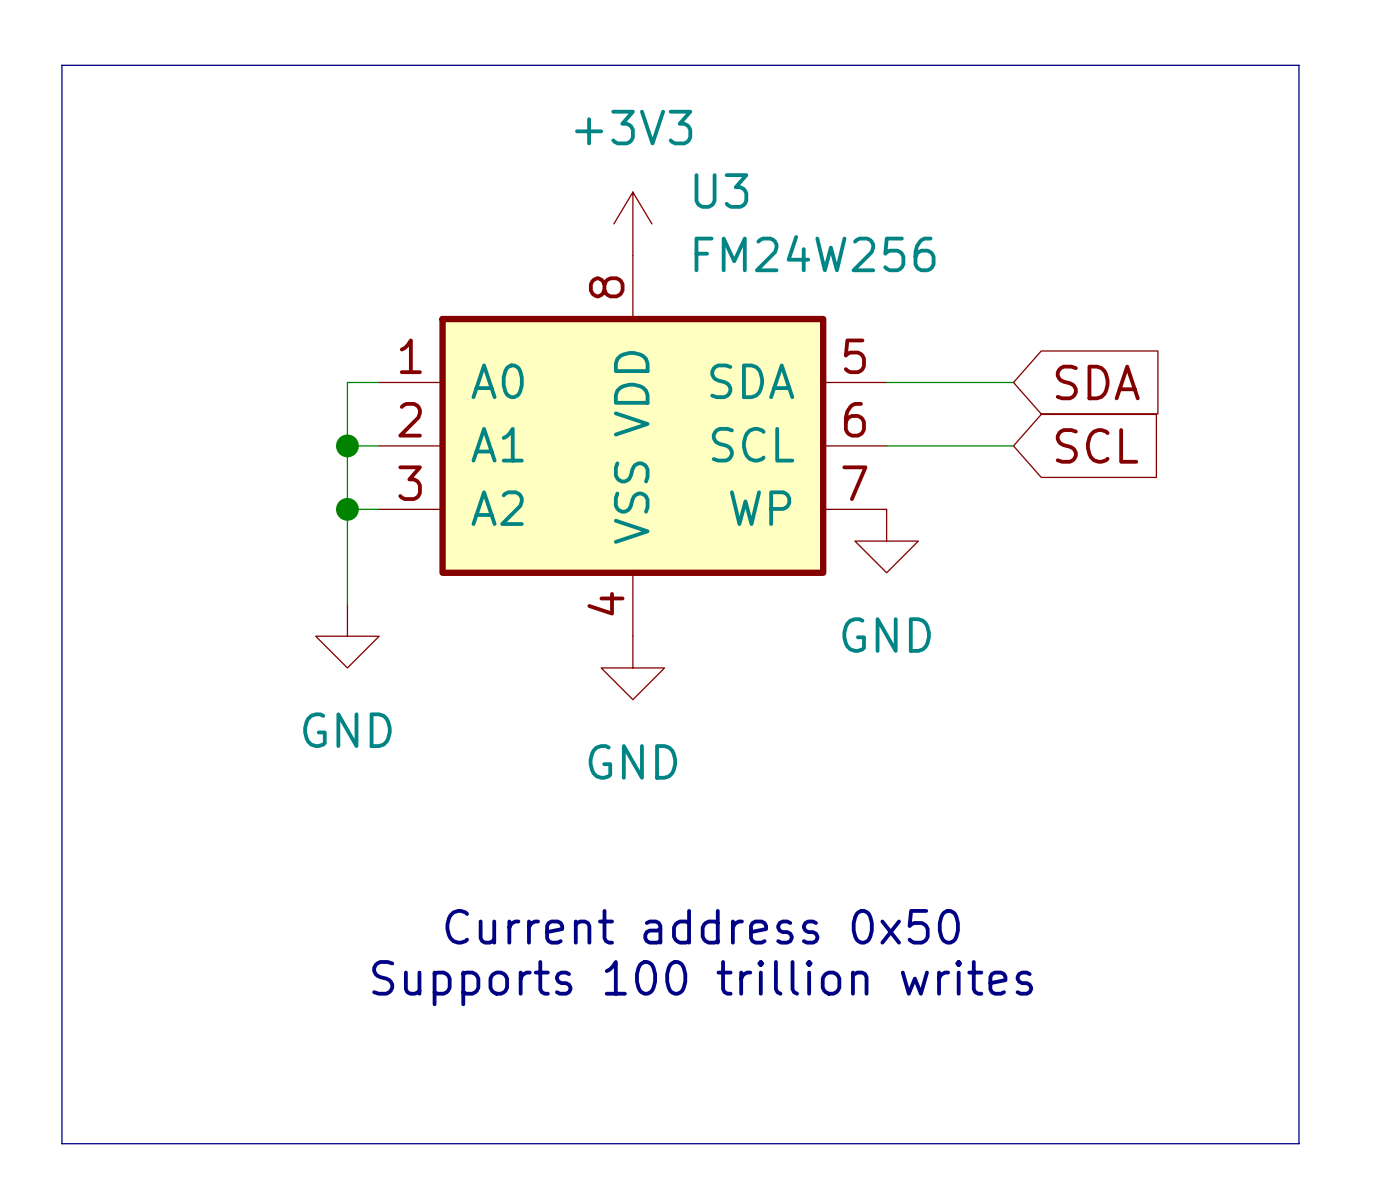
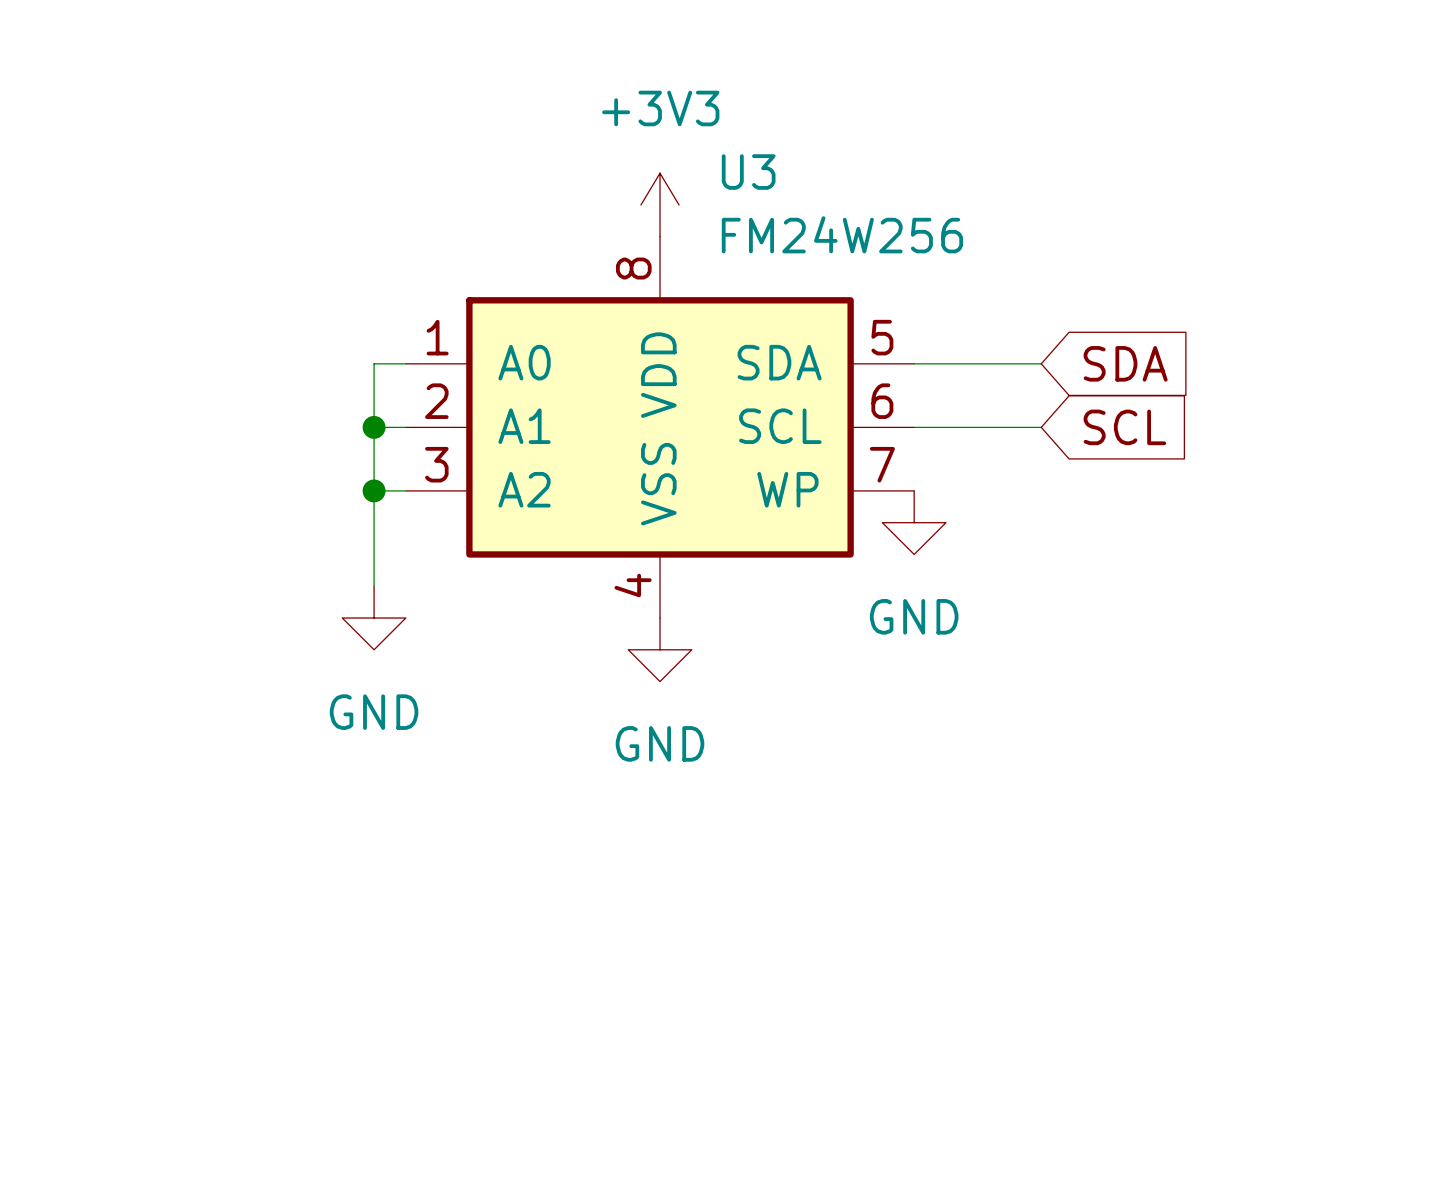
line: (61, 65) (1298, 65) (1298, 1143) (61, 1143) (61, 65) -> none
text: Current address 0x50 (702, 926) -> none
text: Supports 100 trillion writes (702, 983) -> none

